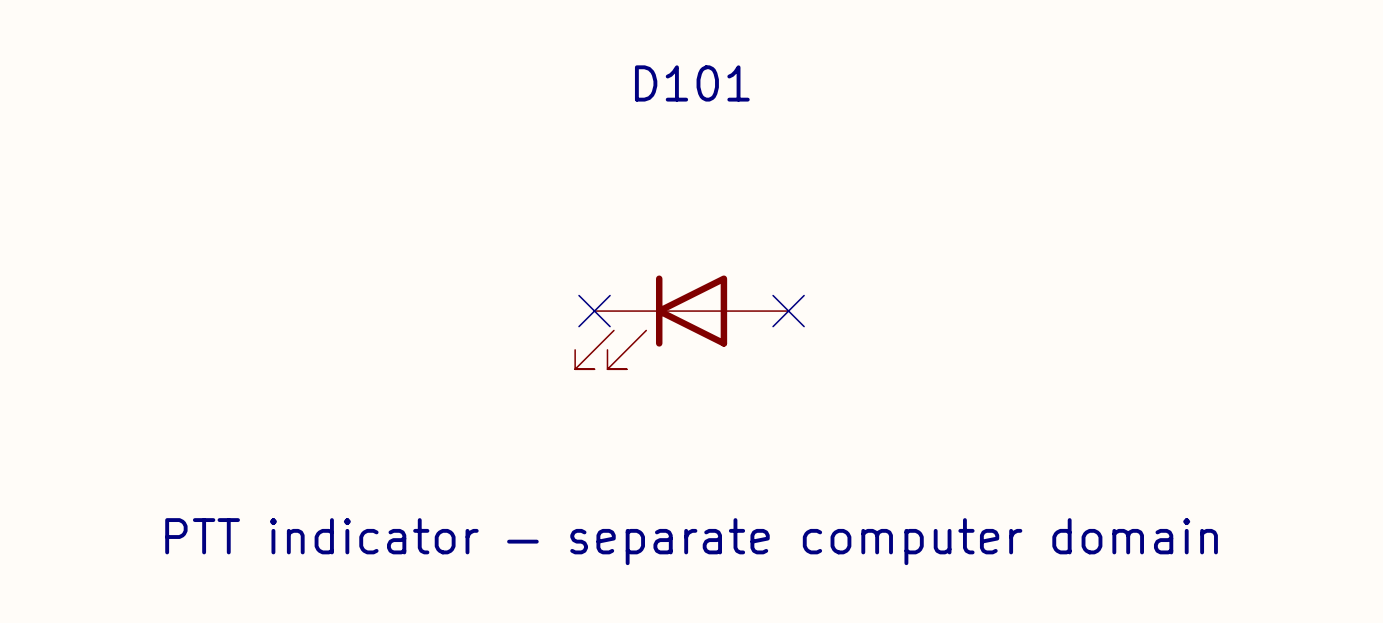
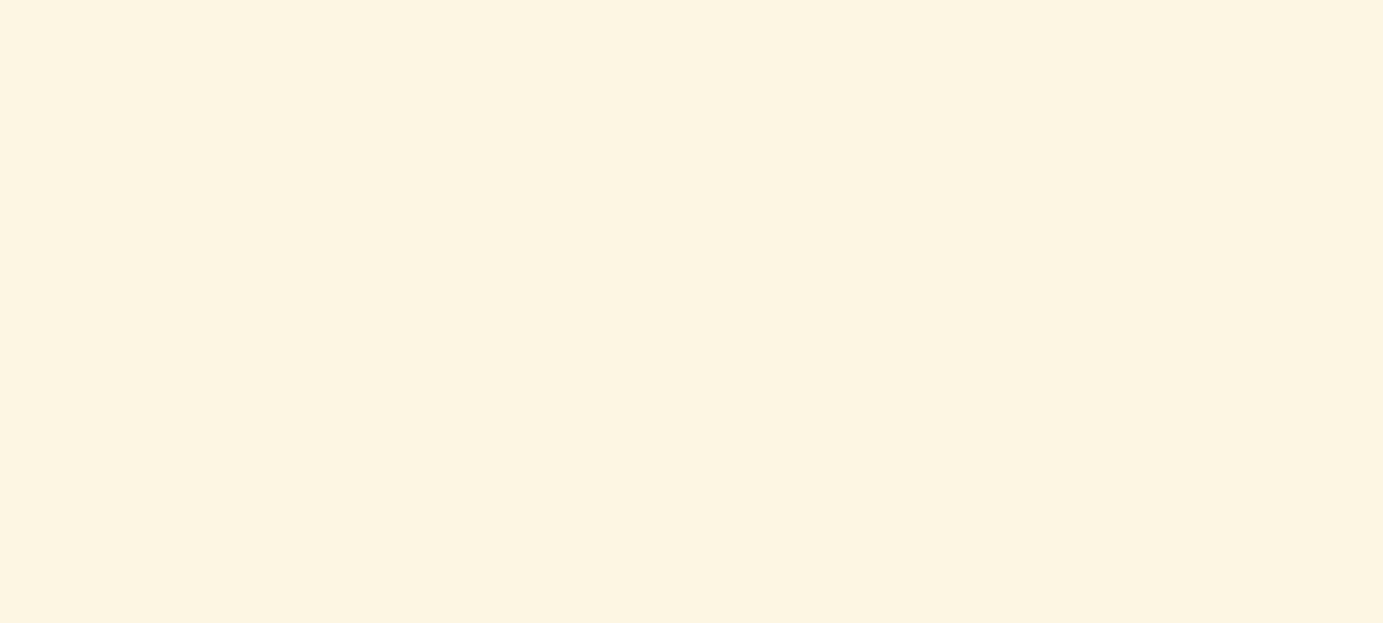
no-connect mark: (594, 311) -> none
no-connect mark: (788, 311) -> none
D101: PTT indicator — separate computer domain (681, 322) -> none

